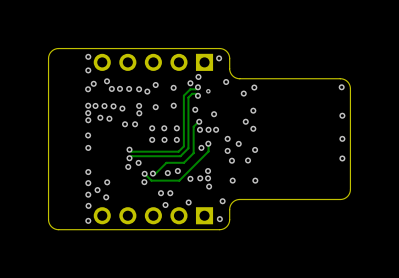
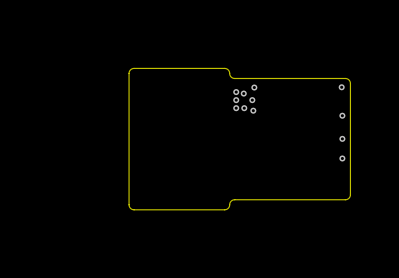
via: (88, 56) -> none
via: (219, 58) -> none
part: (153, 62) -> none
via: (88, 70) -> none
via: (198, 76) -> none
via: (107, 81) -> none
via: (226, 82) -> none
via: (93, 83) -> none
via: (190, 83) -> none
via: (155, 85) -> none
via: (173, 87) -> none
track: (197, 87) (190, 89) (183, 95) (183, 146) (178, 151) (131, 151) (129, 149) -> none
via: (197, 87) -> none
via: (111, 88) -> none
via: (119, 88) -> none
via: (129, 88) -> none
board edge: (350, 88) (348, 82) (341, 78) (236, 78) (230, 71) (228, 54) (220, 48) (58, 48) (51, 51) (48, 57) (48, 219) (49, 224) (54, 228) (220, 229) (228, 223) (230, 206) (236, 200) (341, 199) (348, 195) (350, 189) -> (350, 88) (350, 81) (346, 78) (234, 78) (231, 77) (228, 70) (225, 68) (131, 69) (129, 73) (129, 205) (134, 209) (225, 209) (234, 199) (346, 199) (350, 196) (350, 189)
via: (88, 89) -> none
via: (139, 89) -> none
via: (147, 91) -> none
via: (208, 91) -> none
via: none -> (236, 92)
track: (197, 95) (192, 93) (188, 97) (188, 148) (180, 156) (131, 156) (129, 158) -> none
via: (197, 95) -> none
via: none -> (236, 100)
via: none -> (252, 100)
via: (88, 105) -> none
via: (95, 105) -> none
via: (139, 105) -> none
via: (173, 105) -> none
via: (104, 106) -> none
via: (113, 106) -> none
via: (155, 107) -> none
via: (122, 108) -> none
via: none -> (236, 108)
via: none -> (244, 108)
via: (195, 109) -> none
via: (88, 113) -> none
via: (139, 113) -> none
via: (214, 114) -> none
via: (100, 117) -> none
via: (109, 118) -> none
via: (88, 120) -> none
track: (199, 121) (193, 126) (193, 153) (183, 162) (166, 162) (155, 173) (152, 173) -> none
via: (199, 121) -> none
via: (245, 121) -> none
via: (125, 124) -> none
via: (135, 124) -> none
via: (152, 128) -> none
via: (164, 128) -> none
via: (176, 128) -> none
via: (253, 128) -> none
via: (199, 129) -> none
via: (208, 129) -> none
via: (216, 129) -> none
via: (88, 135) -> none
via: (227, 138) -> none
via: (152, 139) -> none
via: (164, 139) -> none
via: (176, 139) -> none
track: (208, 143) (208, 151) (179, 180) (151, 180) (144, 173) -> none
via: (208, 143) -> none
via: (238, 143) -> none
via: (88, 147) -> none
via: (201, 147) -> none
via: (129, 149) -> none
via: (255, 149) -> none
via: (227, 150) -> none
via: (129, 158) -> none
via: (231, 160) -> none
via: (248, 160) -> none
via: (138, 162) -> none
via: (128, 166) -> none
via: (177, 171) -> none
via: (208, 171) -> none
via: (88, 172) -> none
via: (144, 173) -> none
via: (152, 173) -> none
via: (167, 173) -> none
via: (190, 178) -> none
via: (200, 178) -> none
via: (208, 178) -> none
via: (232, 180) -> none
via: (255, 180) -> none
via: (107, 182) -> none
via: (144, 182) -> none
via: (88, 183) -> none
via: (209, 186) -> none
via: (97, 190) -> none
via: (161, 193) -> none
via: (170, 193) -> none
via: (88, 194) -> none
via: (106, 197) -> none
via: (222, 201) -> none
via: (188, 202) -> none
via: (88, 205) -> none
via: (165, 205) -> none
part: (153, 215) -> none
via: (219, 219) -> none
via: (88, 220) -> none

